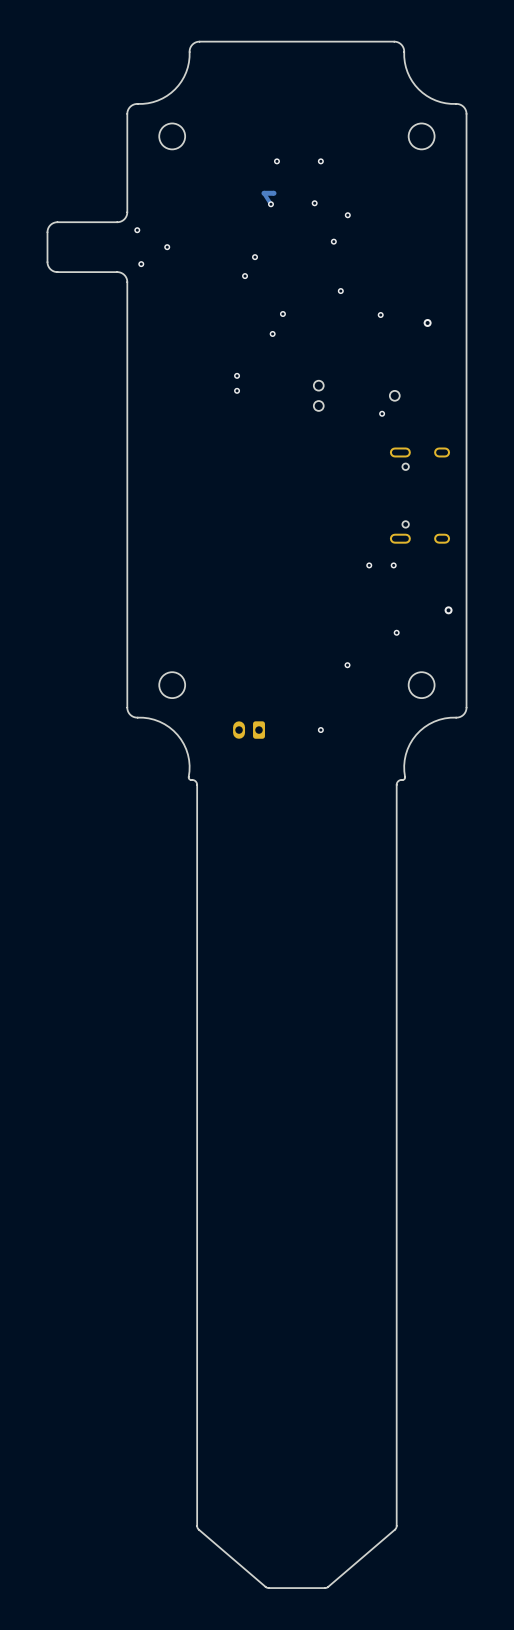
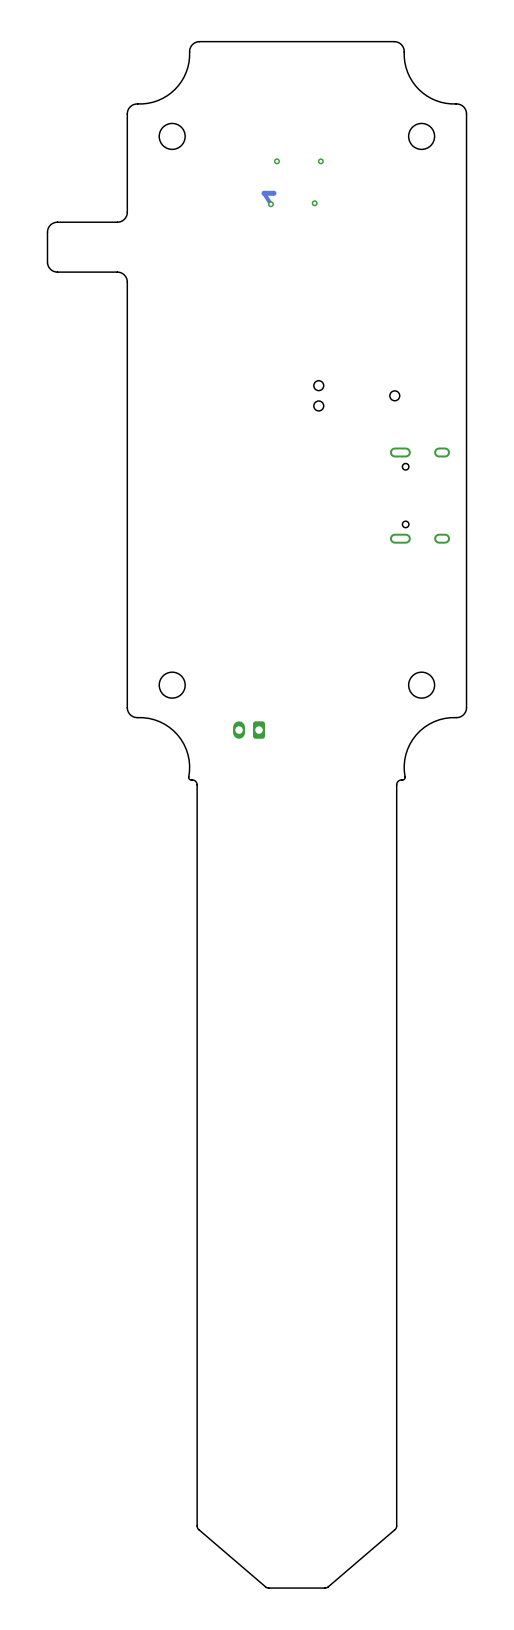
via: (347, 215) -> none
via: (137, 230) -> none
via: (333, 241) -> none
via: (167, 247) -> none
via: (255, 257) -> none
via: (141, 264) -> none
via: (245, 276) -> none
via: (340, 291) -> none
via: (282, 314) -> none
via: (380, 315) -> none
via: (427, 322) -> none
via: (272, 333) -> none
via: (237, 375) -> none
via: (237, 390) -> none
via: (382, 413) -> none
via: (369, 565) -> none
via: (393, 565) -> none
via: (448, 610) -> none
via: (396, 632) -> none
via: (347, 665) -> none
via: (320, 730) -> none

